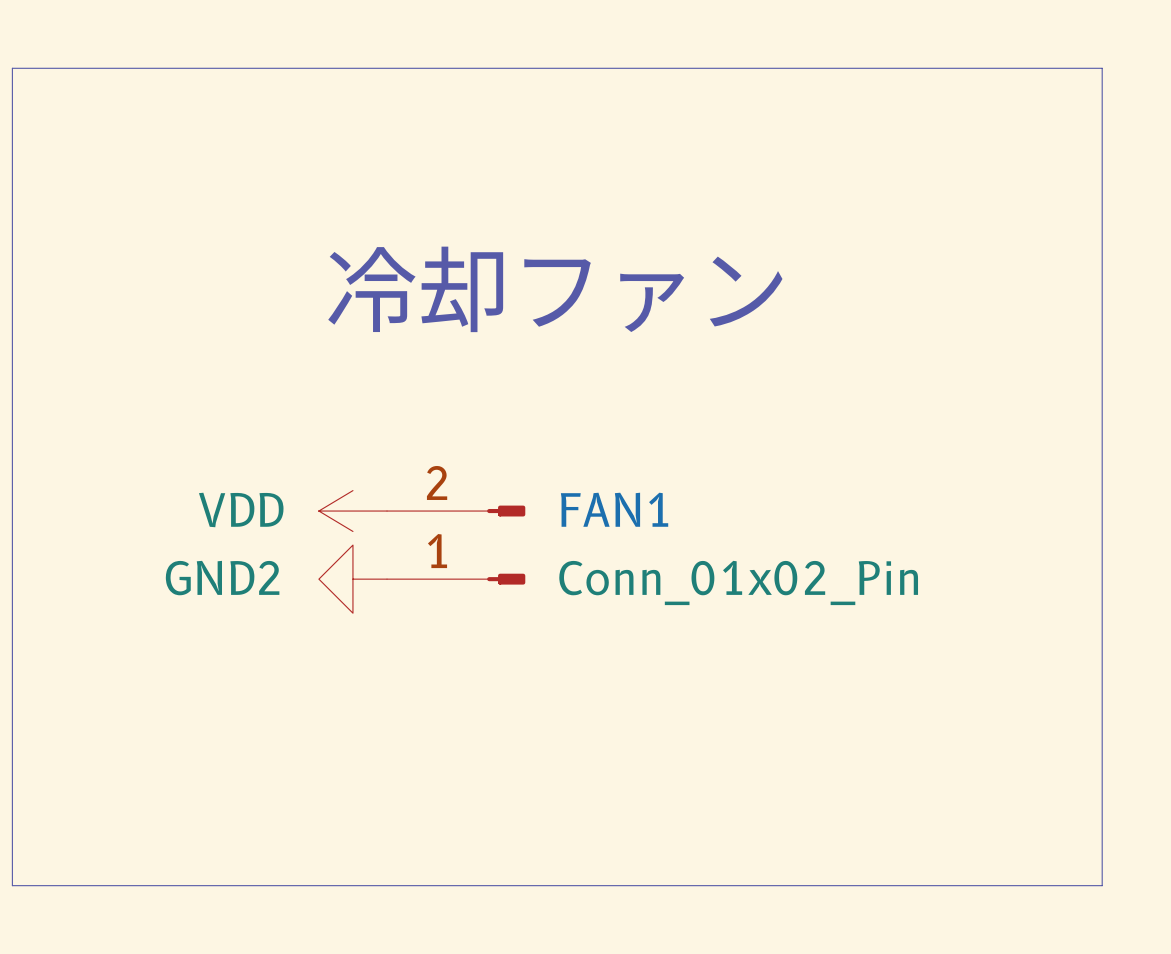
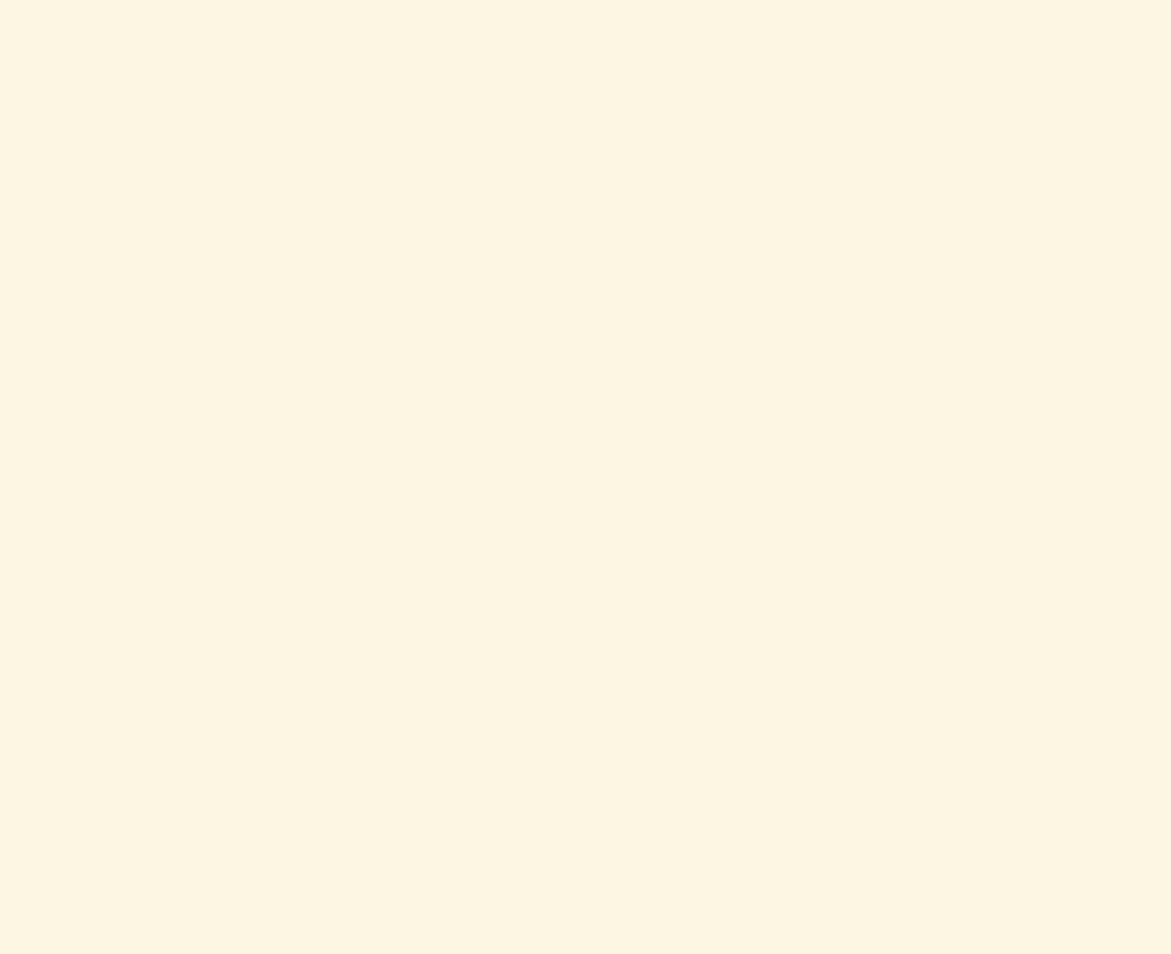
line: (12, 68) (1102, 68) (1102, 885) (12, 885) (12, 68) -> none
text: 冷却ファン (555, 289) -> none
power symbol: VDD (352, 511) -> none
FAN1: Conn_01x02_Pin (456, 545) -> none
power symbol: GND2 (352, 579) -> none

